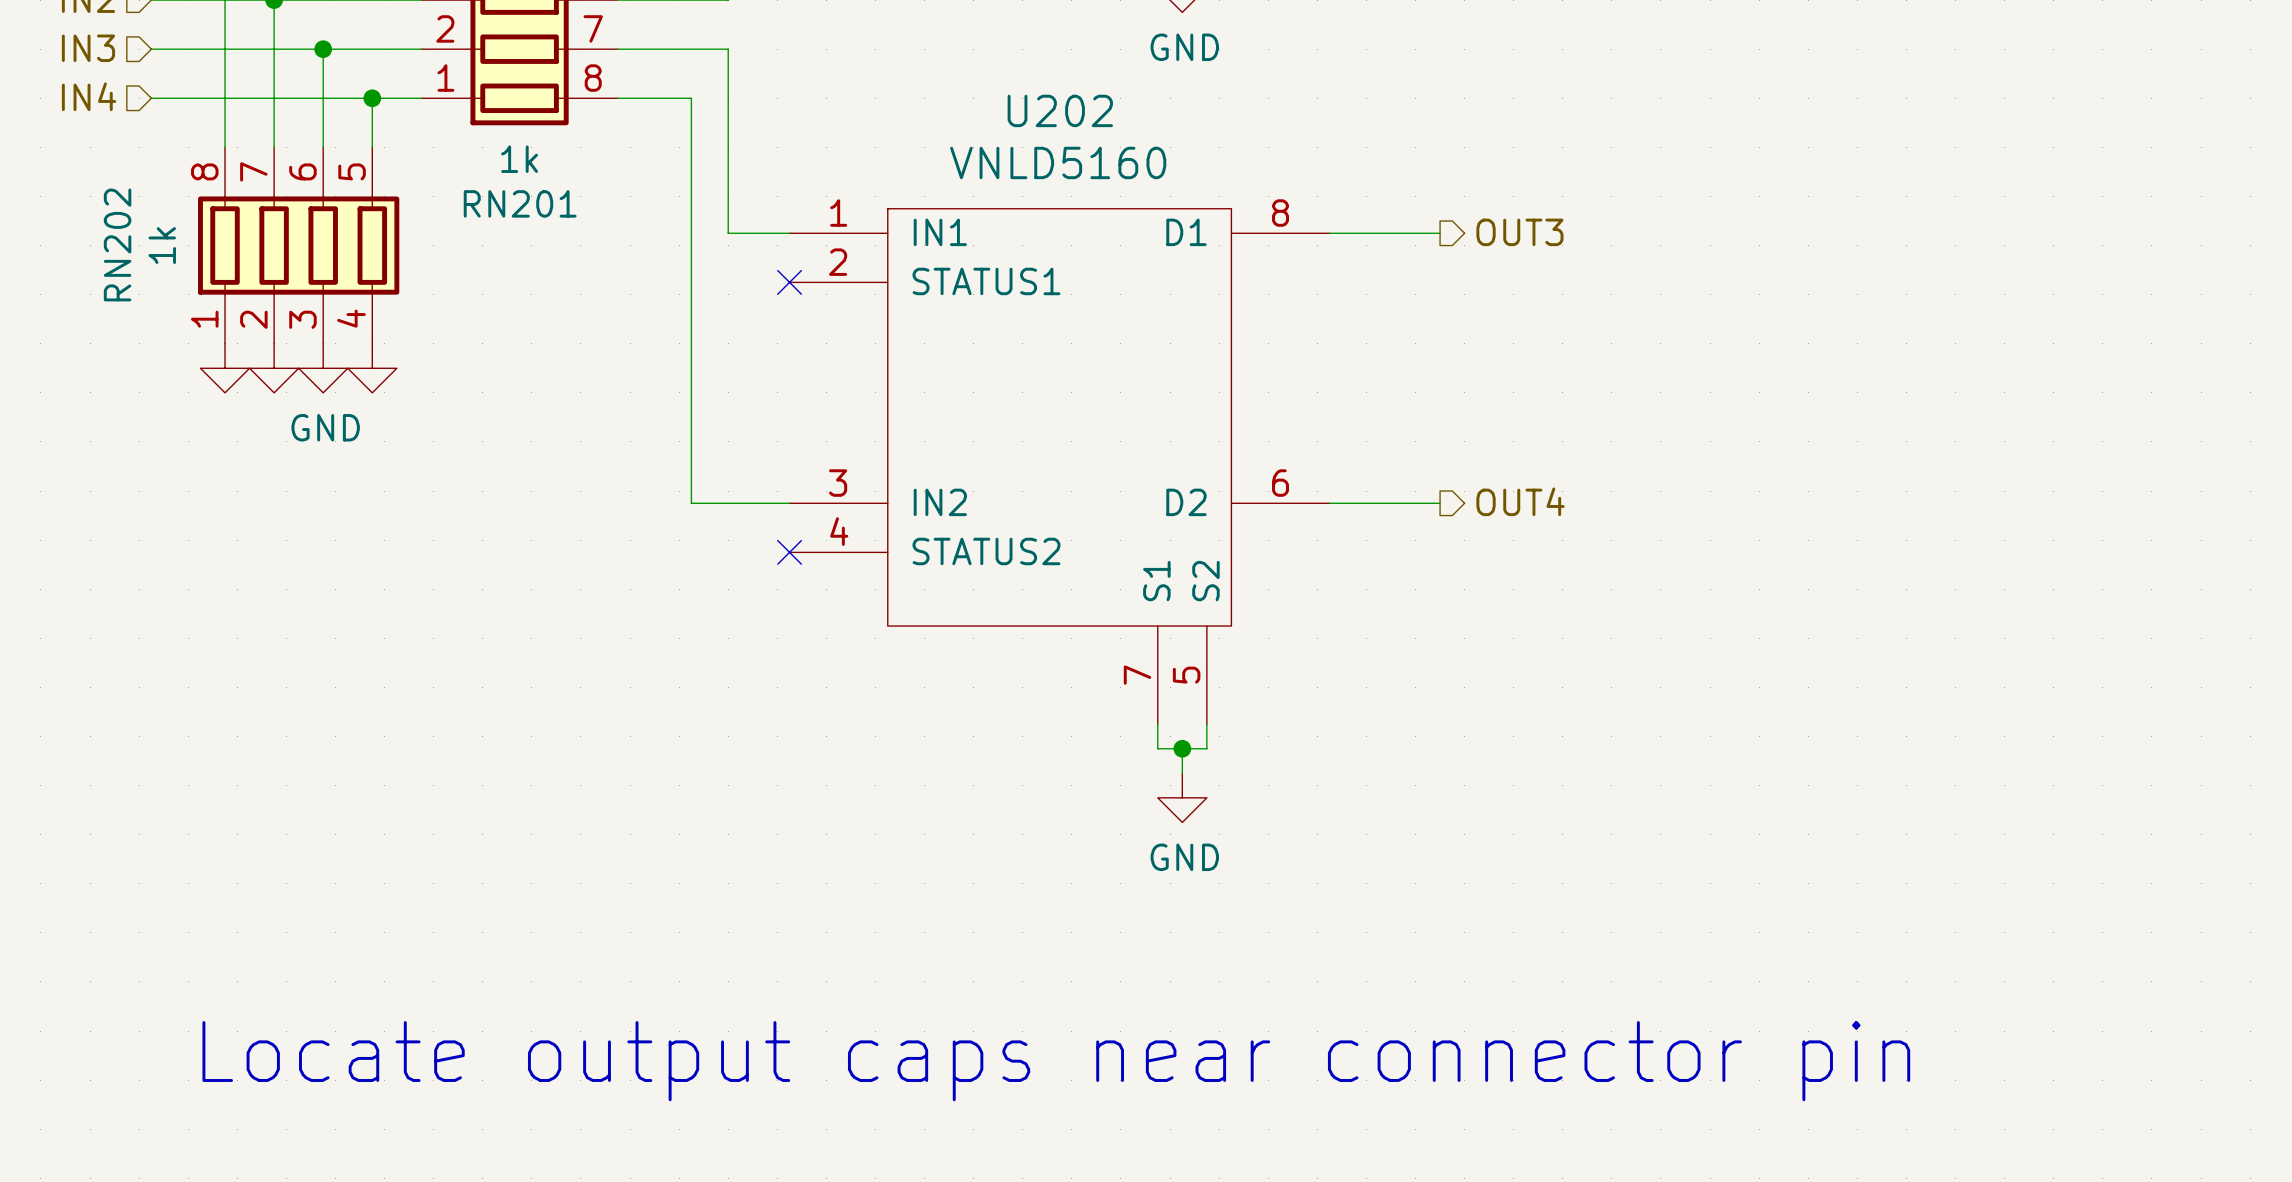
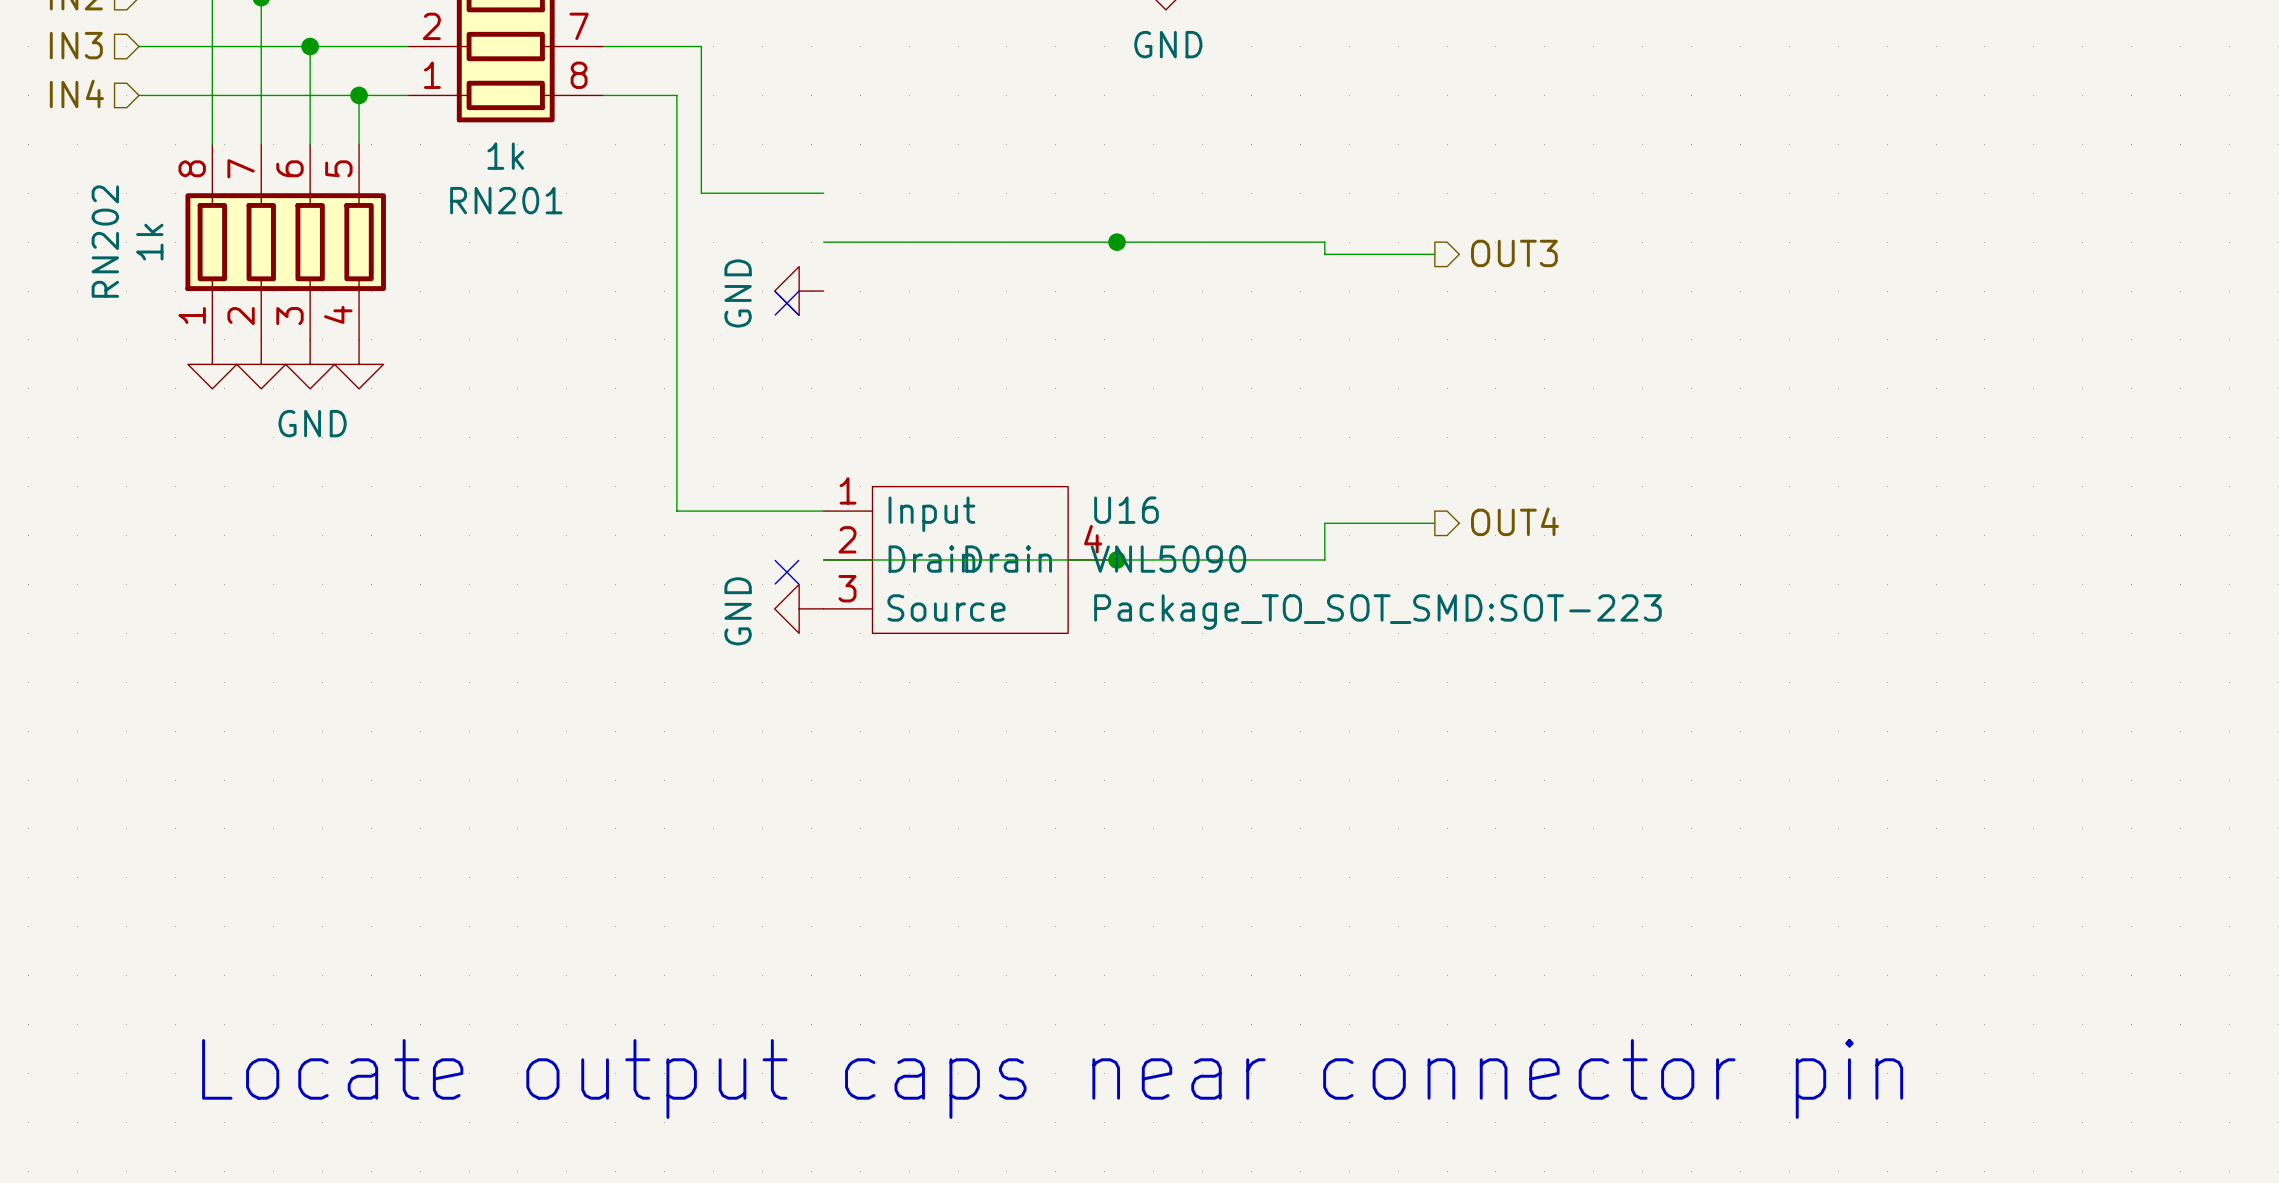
wire: (715, 49) (728, 49) (728, 233) (789, 233) -> (701, 46) (701, 193) (823, 193)
hierarchical label position: OUT3 (1519, 232) -> OUT3 (1514, 253)
wire: (1329, 233) (1440, 233) -> none
wire: none -> (823, 242) (1324, 242) (1324, 254) (1434, 254)
junction: none -> (1116, 242)
no-connect mark position: (789, 282) -> (786, 303)
power symbol: none -> GND (799, 291)
U202: VNLD5160 (1059, 466) -> none
hierarchical label position: OUT4 (1520, 501) -> OUT4 (1514, 521)
wire: (691, 503) (789, 503) -> (676, 498) (676, 511) (823, 511)
wire: (1329, 503) (1440, 503) -> none
wire: none -> (1434, 523) (1324, 523) (1324, 559) (823, 559)
no-connect mark position: (789, 552) -> (786, 572)
U16: none -> VNL5090 (970, 559)
junction: none -> (1116, 559)
power symbol: none -> GND (799, 608)
wire: (1157, 724) (1157, 748) (1206, 748) (1206, 724) -> none
wire: (1182, 748) (1182, 773) -> none
junction: (1182, 748) -> none
power symbol: GND (1182, 797) -> none
text position: Locate output caps near connector pin (1056, 1061) -> Locate output caps near connector pin (1052, 1079)

